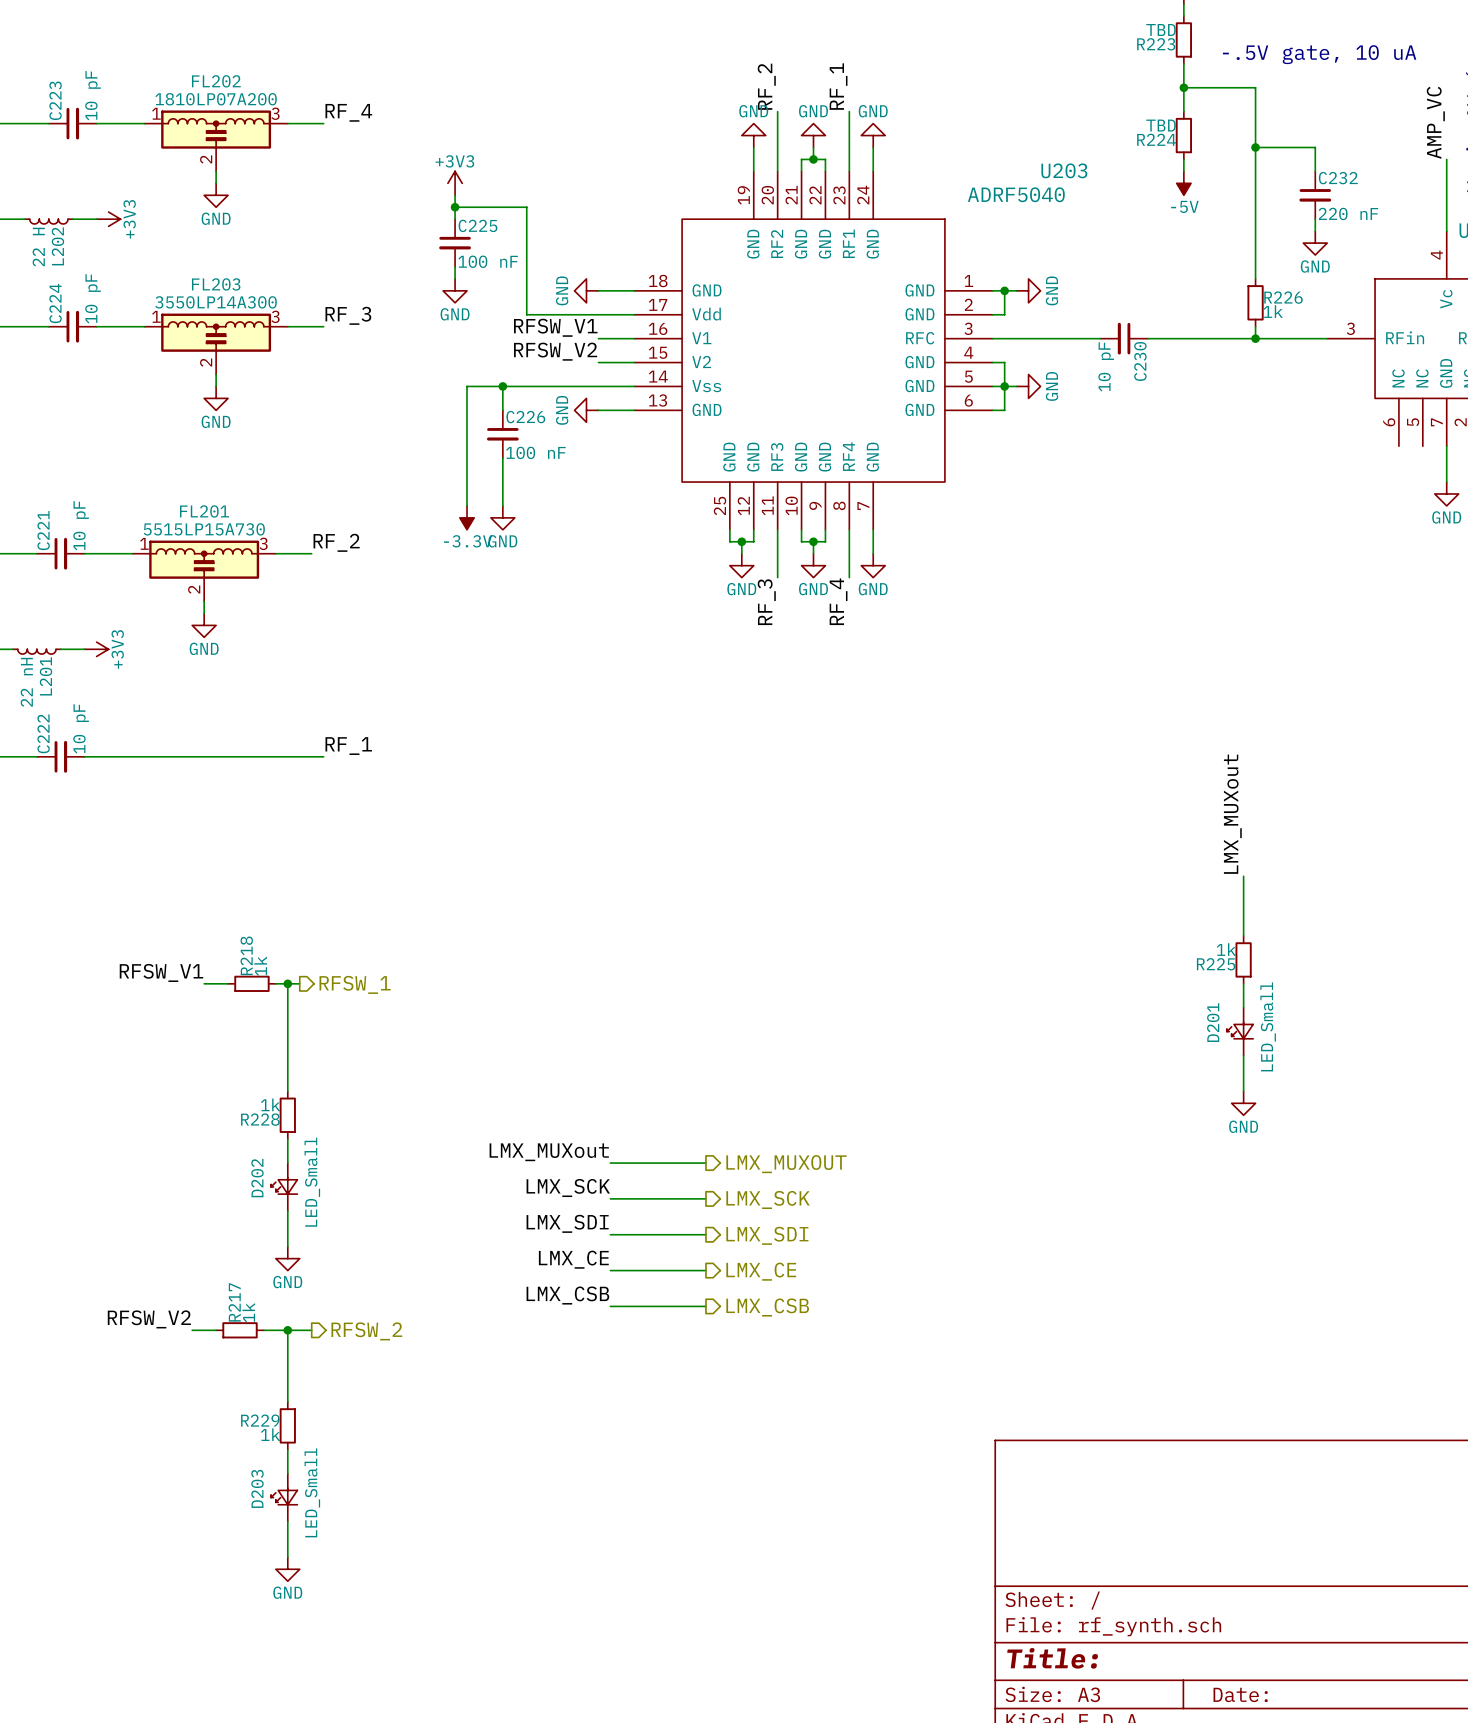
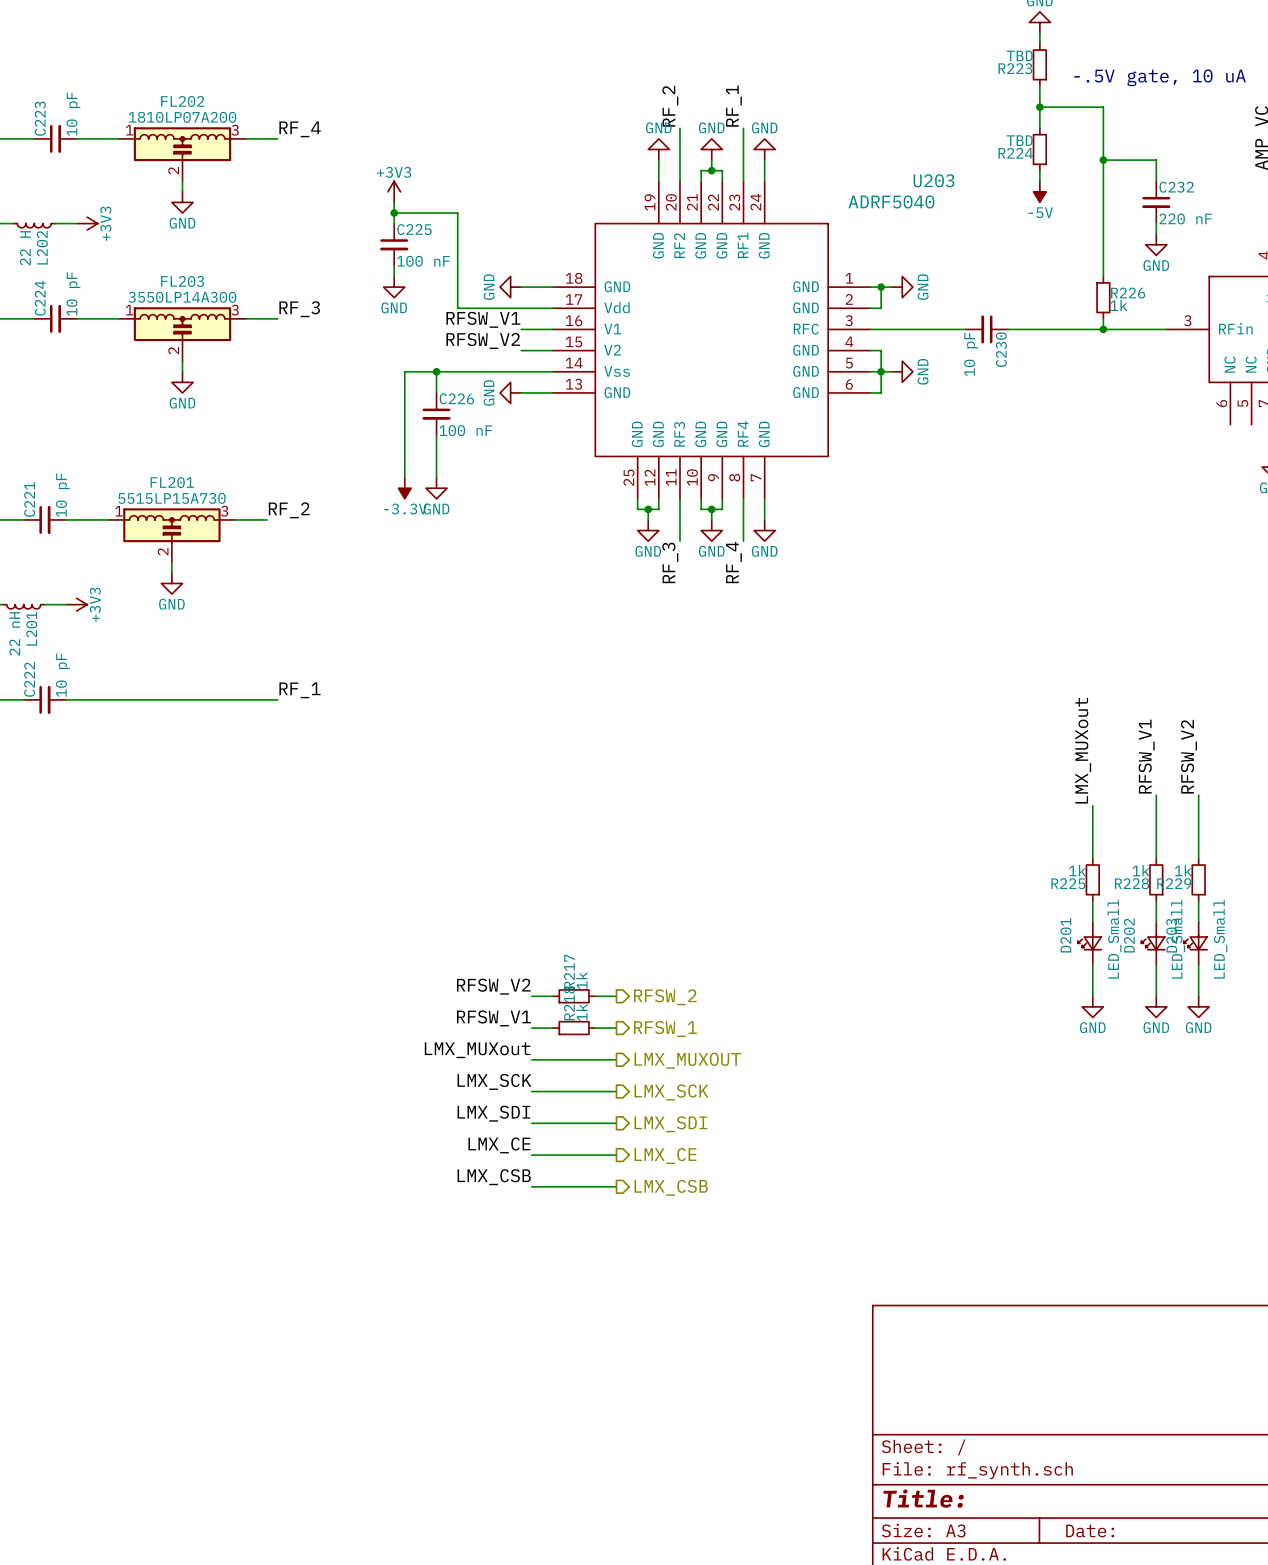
label: none -> RFSW_V1 (1146, 756)
label: none -> RFSW_V2 (1189, 756)
wire: none -> (1156, 795) (1156, 858)
wire: none -> (1198, 795) (1198, 858)
label: RFSW_V1 (161, 972) -> none
wire: (204, 983) (228, 983) -> none
R218 position: (251, 983) -> (574, 1028)
wire: (275, 983) (299, 983) -> none
wire: (287, 983) (287, 1091) -> none
junction: (287, 983) -> none
wire: none -> (1156, 901) (1156, 922)
wire: none -> (1198, 901) (1198, 922)
hierarchical label: RFSW_1 (355, 984) -> none
wire: none -> (1156, 964) (1156, 996)
wire: none -> (1198, 964) (1198, 996)
label: none -> RFSW_V2 (493, 986)
wire: none -> (531, 996) (552, 996)
wire: none -> (595, 996) (616, 996)
hierarchical label: none -> RFSW_2 (665, 997)
power symbol: none -> GND (1156, 1006)
power symbol: none -> GND (1198, 1006)
R228 position: (287, 1115) -> (1156, 879)
label: none -> RFSW_V1 (493, 1018)
wire: none -> (531, 1028) (552, 1028)
wire: none -> (595, 1028) (616, 1028)
hierarchical label: none -> RFSW_1 (665, 1029)
wire: (287, 1139) (287, 1163) -> none
D202 position: (284, 1186) -> (1153, 943)
wire: (287, 1210) (287, 1246) -> none
power symbol: GND (287, 1258) -> none
label: RFSW_V2 (149, 1319) -> none
wire: (192, 1330) (216, 1330) -> none
R217 position: (240, 1330) -> (574, 996)
wire: (263, 1330) (311, 1330) -> none
wire: (287, 1330) (287, 1402) -> none
junction: (287, 1330) -> none
hierarchical label: RFSW_2 (366, 1331) -> none
R229 name position: R229 (260, 1420) -> R229 (1174, 883)
R229 position: (287, 1425) -> (1198, 879)
R229 value position: 1k (270, 1434) -> 1k (1183, 870)
wire: (287, 1449) (287, 1473) -> none
D203 position: (284, 1497) -> (1195, 943)
wire: (287, 1521) (287, 1557) -> none
power symbol: GND (287, 1569) -> none

